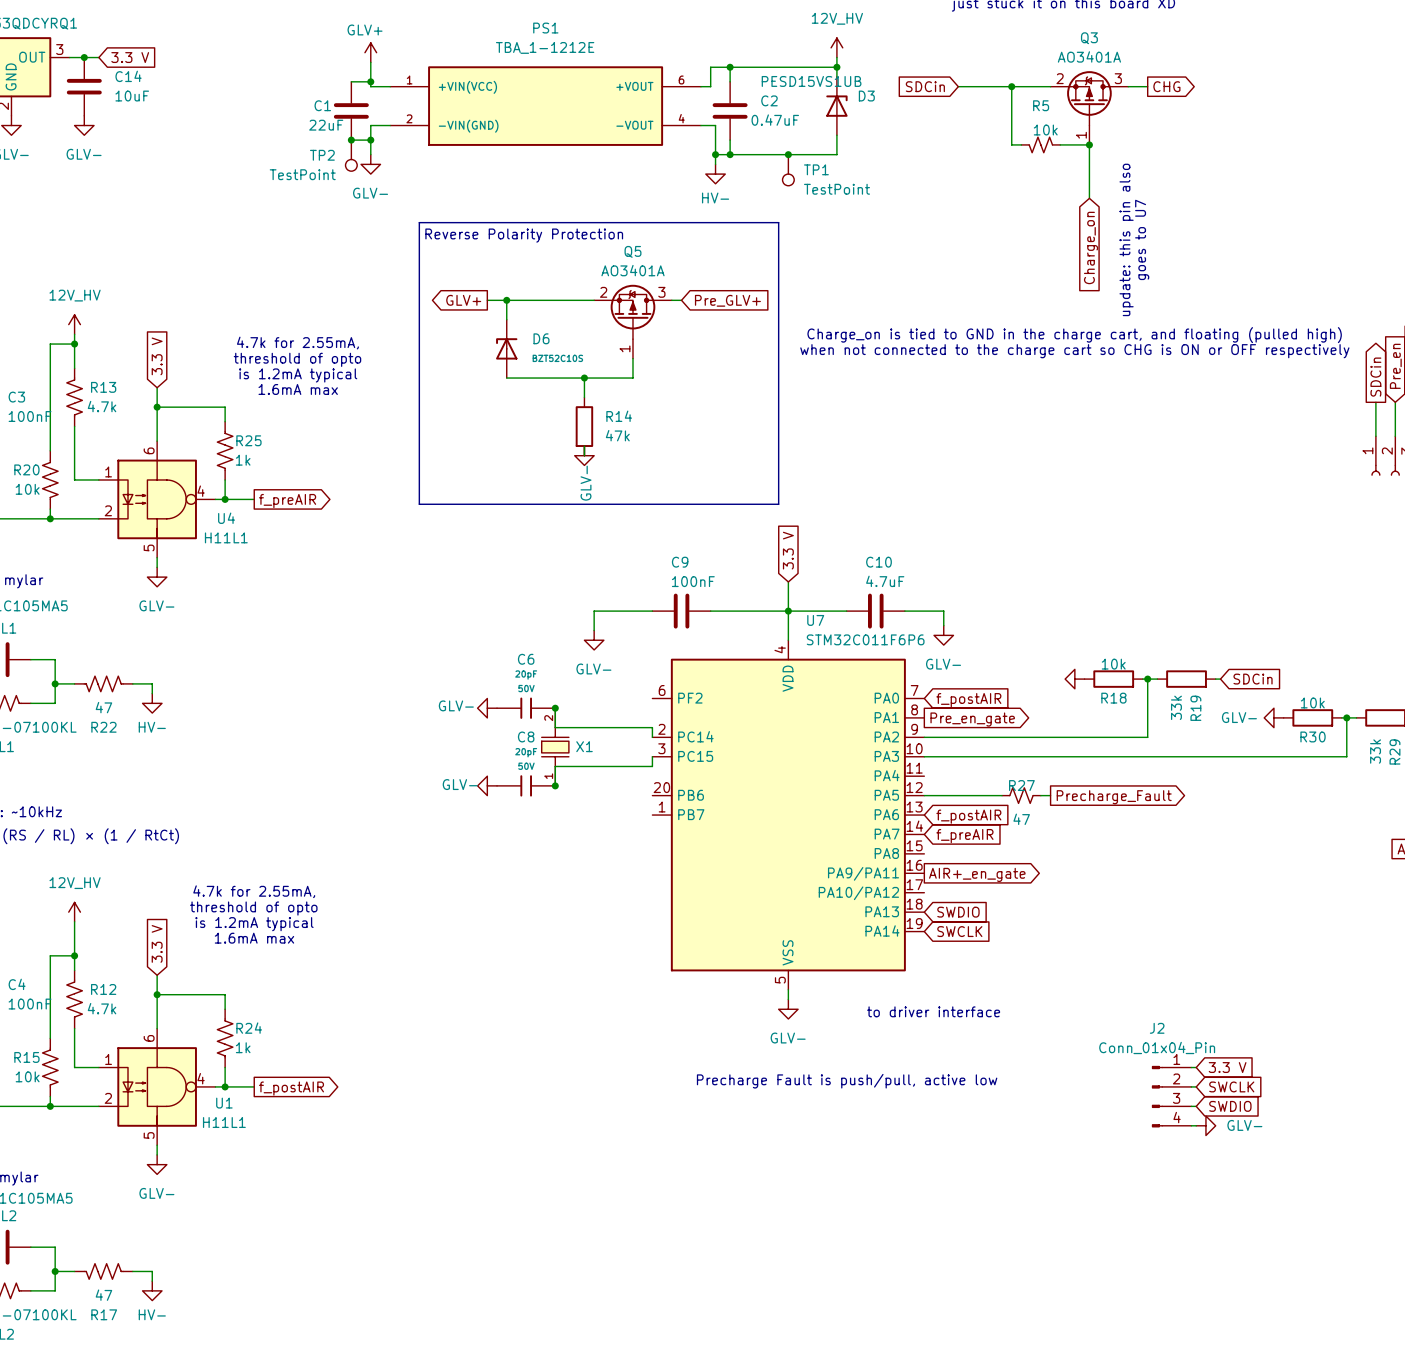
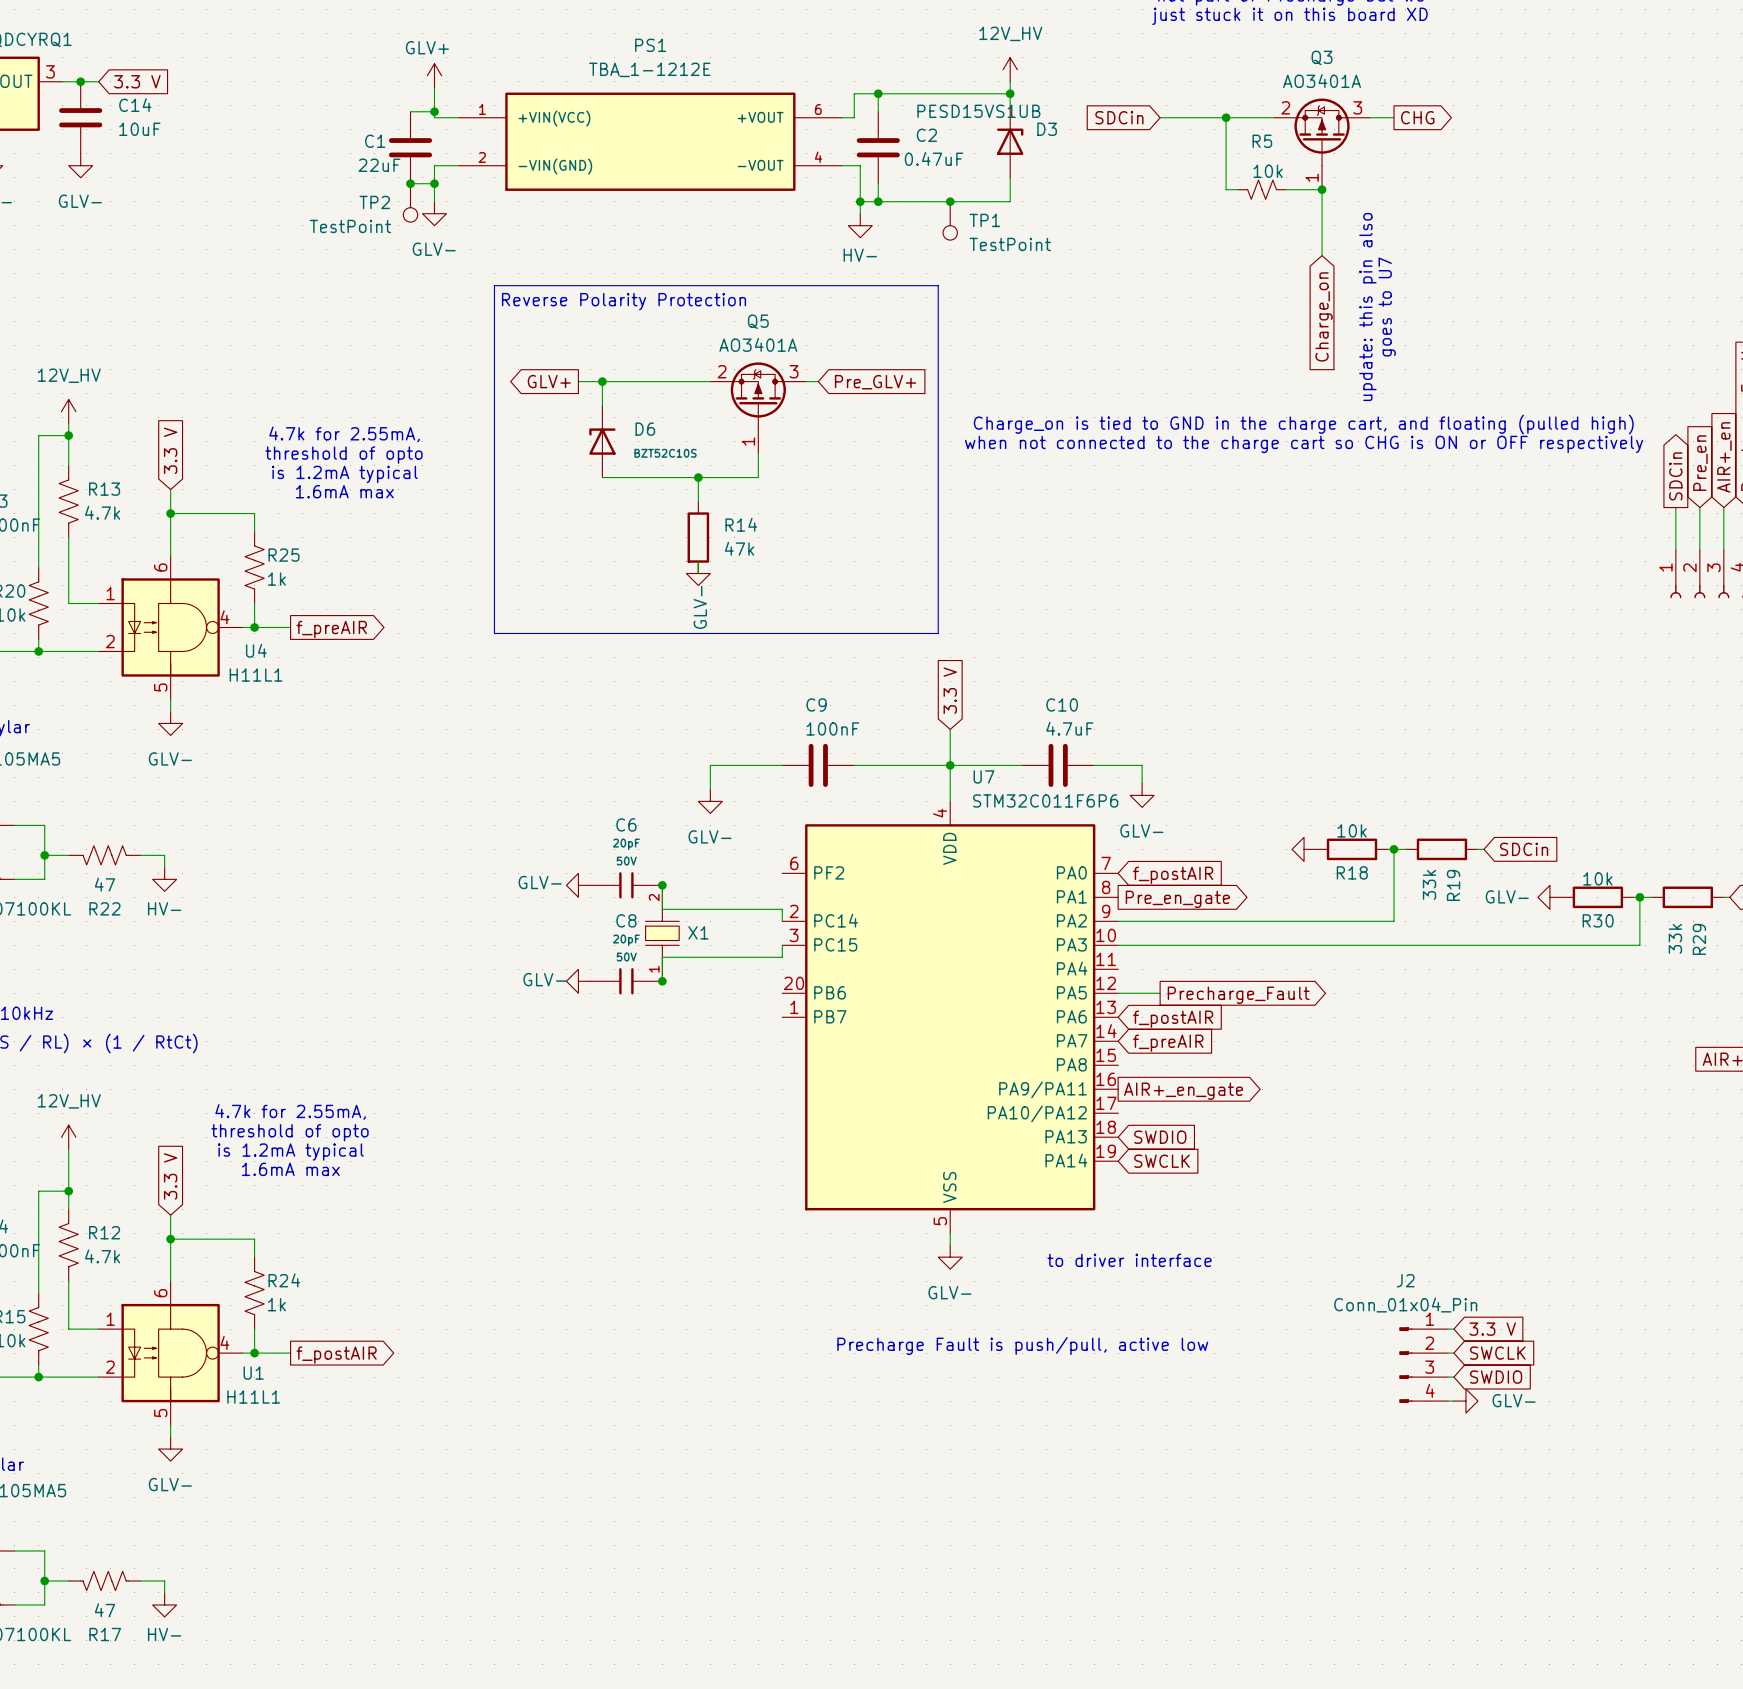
wire: (958, 795) (1002, 795) -> none
R27: 47 (1021, 795) -> none
wire: (1040, 795) (1050, 795) -> none
global label position: Precharge_Fault (1114, 797) -> Precharge_Fault (1238, 995)

